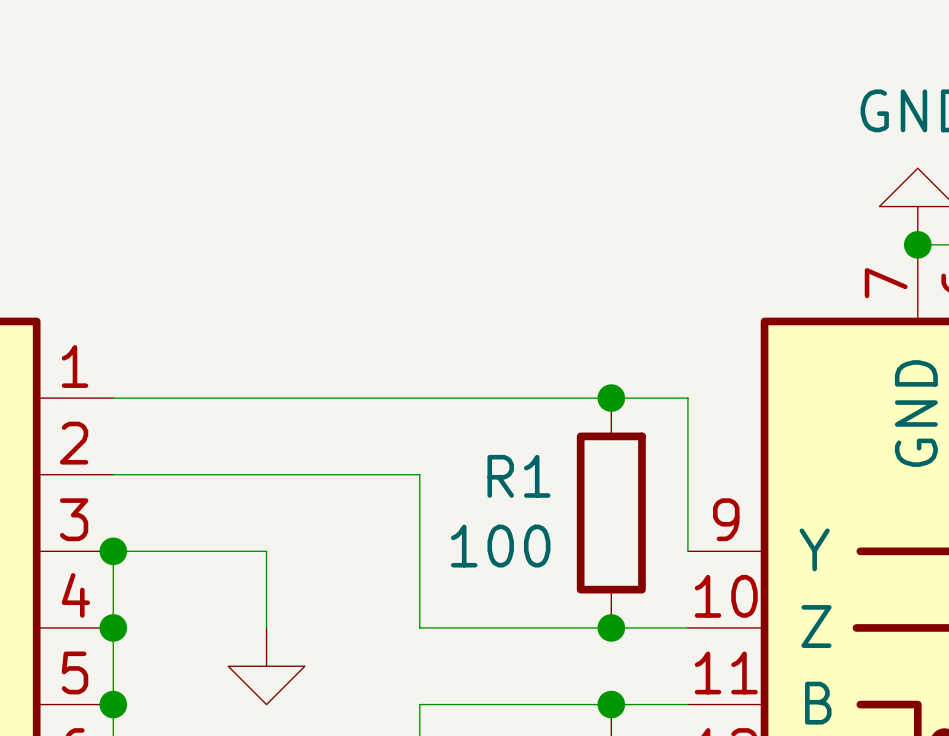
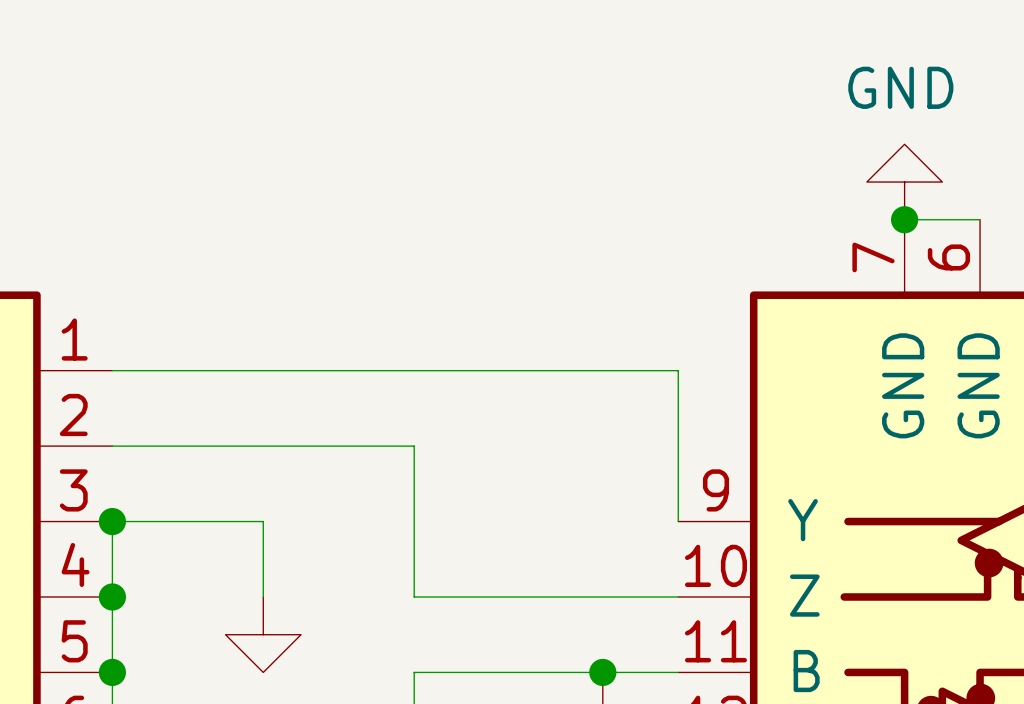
junction: (611, 398) -> none
R1: 100 (611, 513) -> none
junction: (611, 627) -> none

